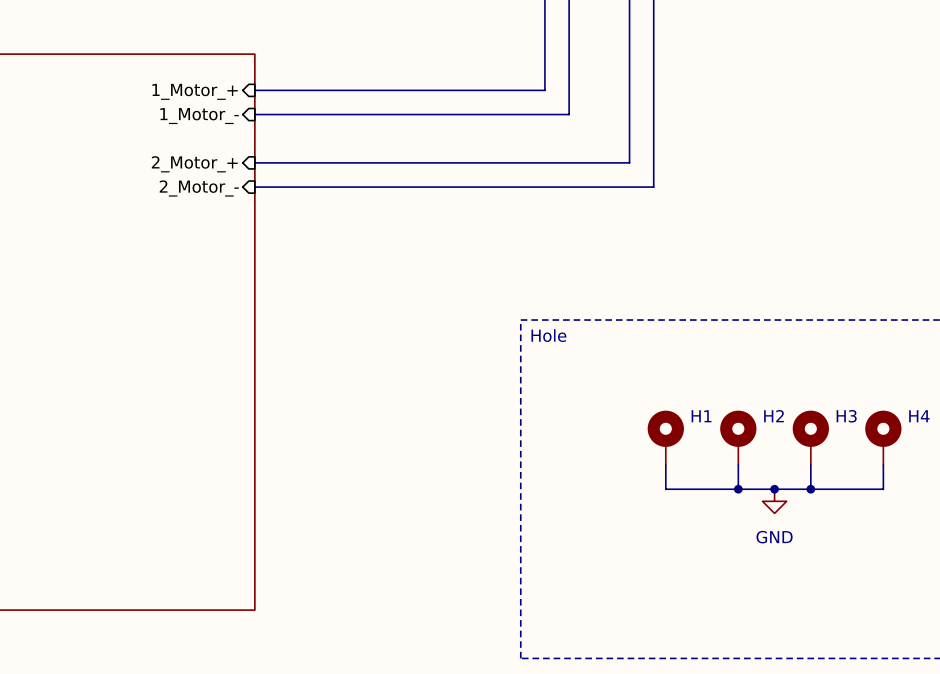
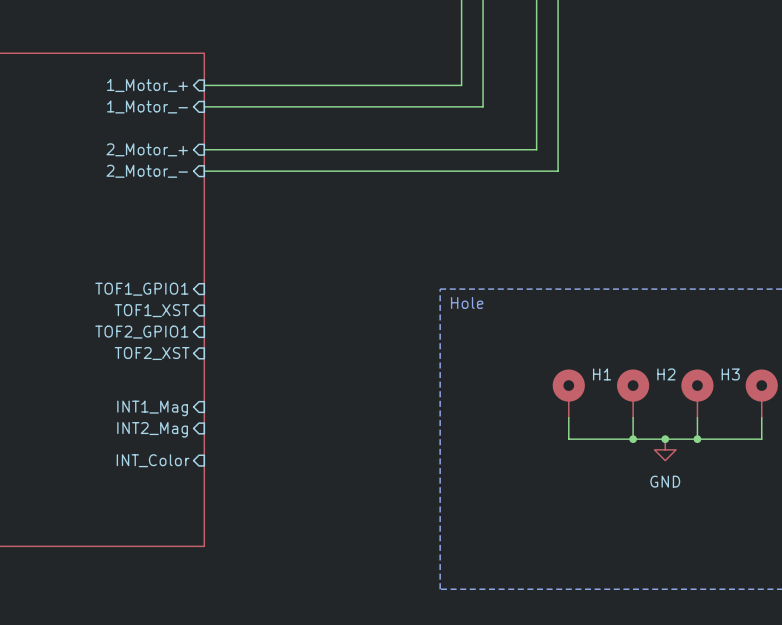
sheet pin: none -> TOF1_GPIO1 (141, 289)
sheet pin: none -> TOF1_XST (152, 310)
sheet pin: none -> TOF2_GPIO1 (141, 332)
sheet pin: none -> TOF2_XST (152, 353)
sheet pin: none -> INT1_Mag (152, 408)
sheet pin: none -> INT2_Mag (152, 429)
sheet pin: none -> INT_Color (153, 460)

